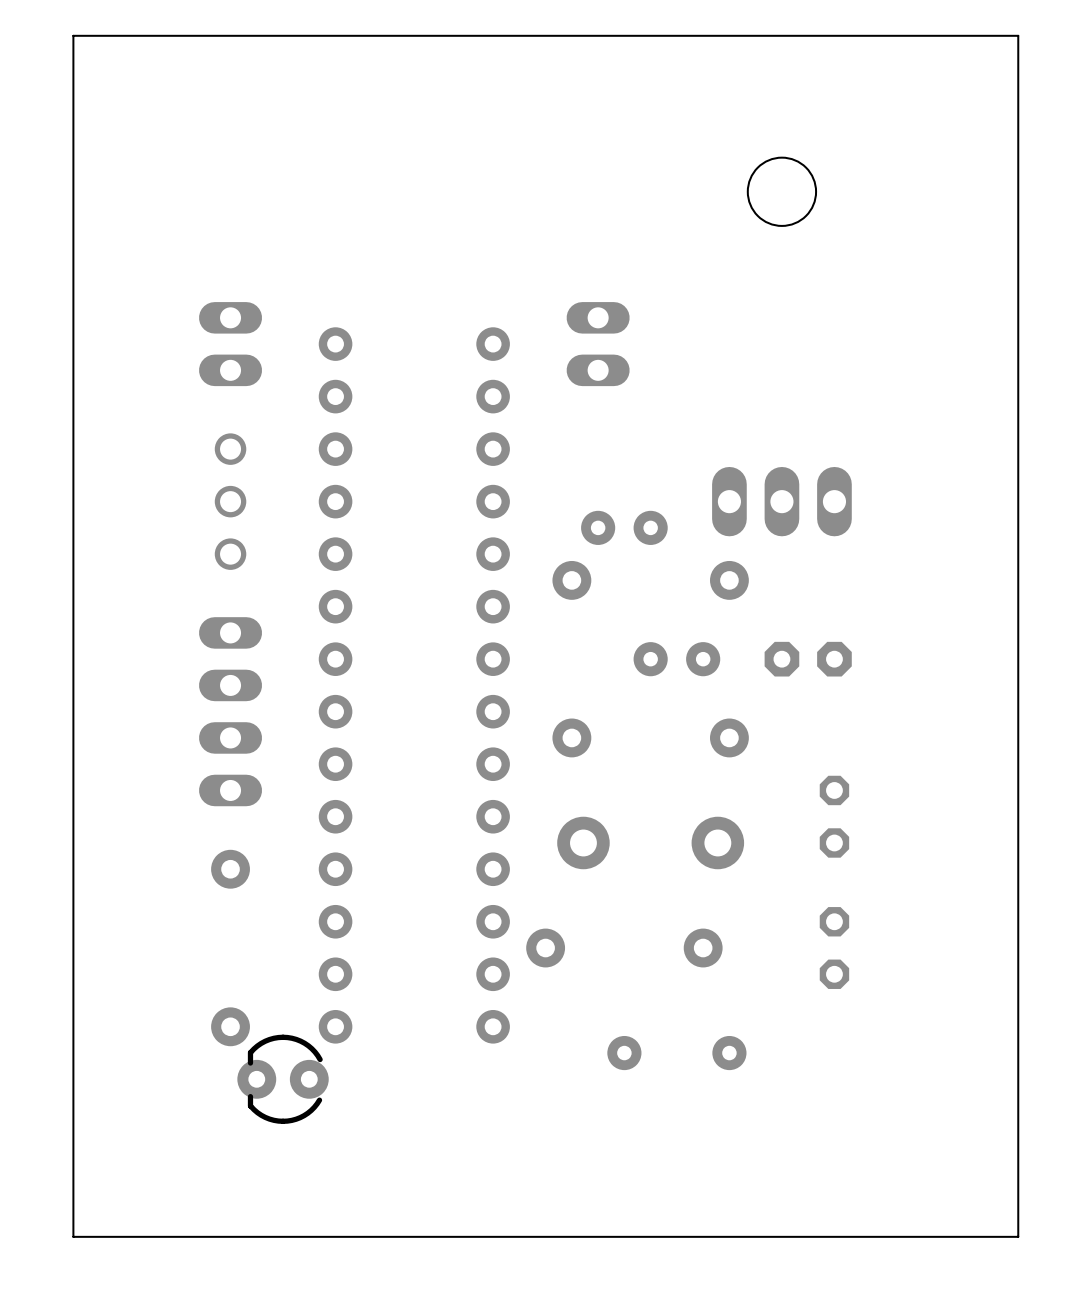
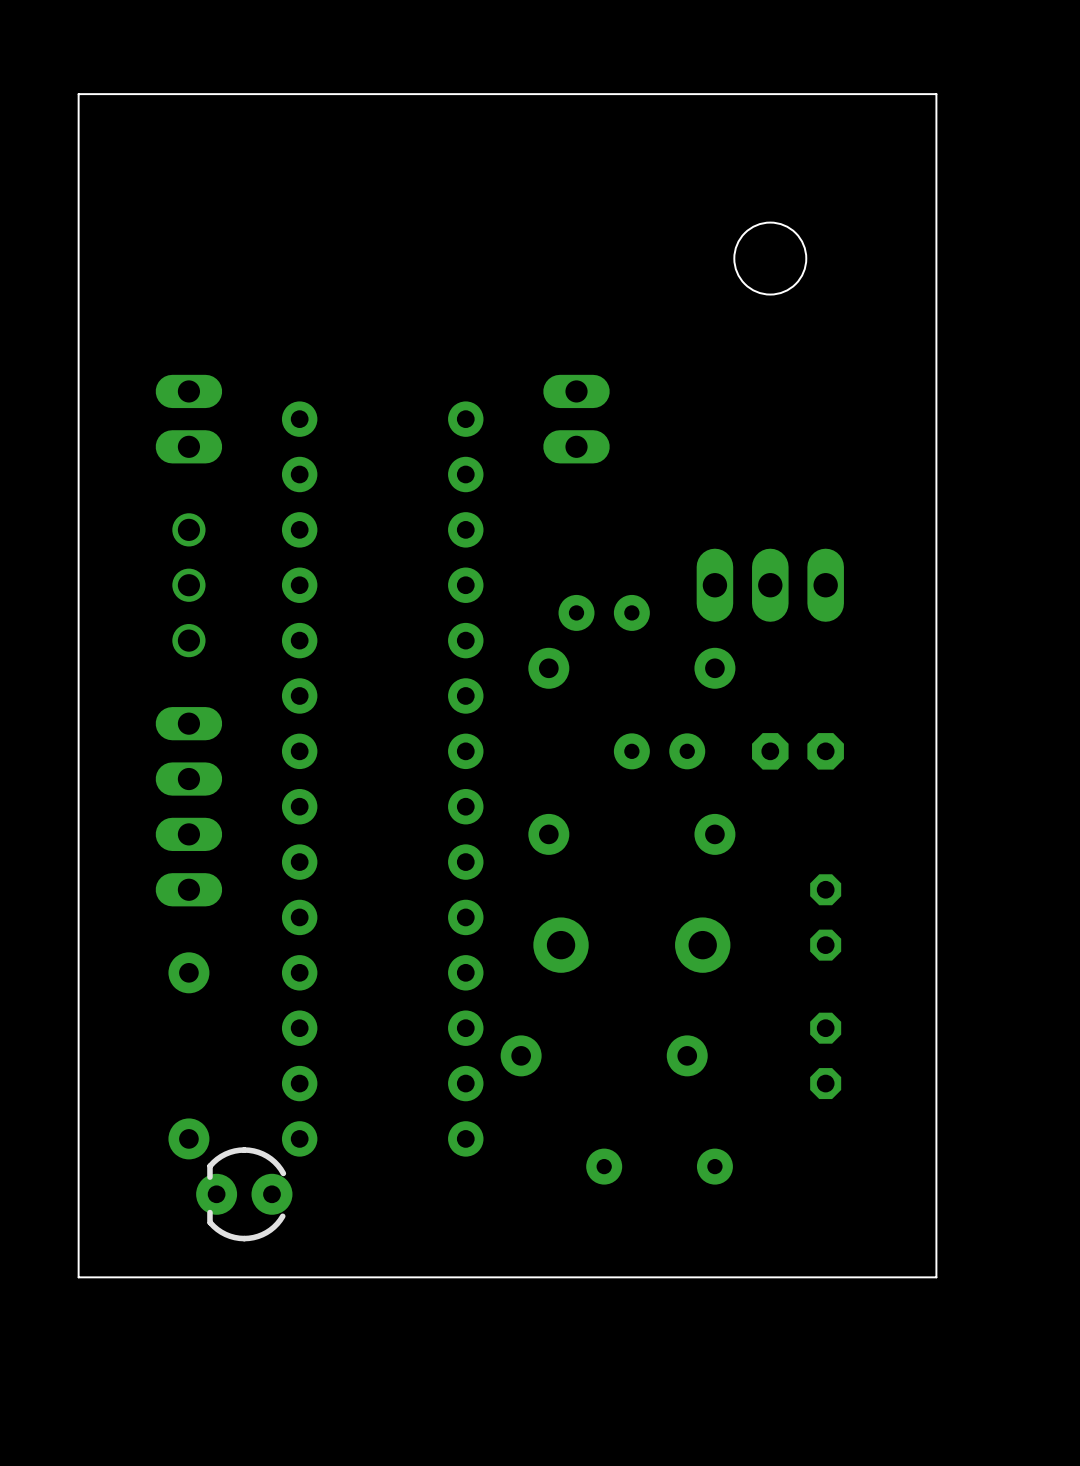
board edge: (939, 35) (1018, 35) (1018, 1236) (73, 1236) (73, 35) (125, 35) -> (936, 94) (936, 1277) (78, 1277) (78, 94)

